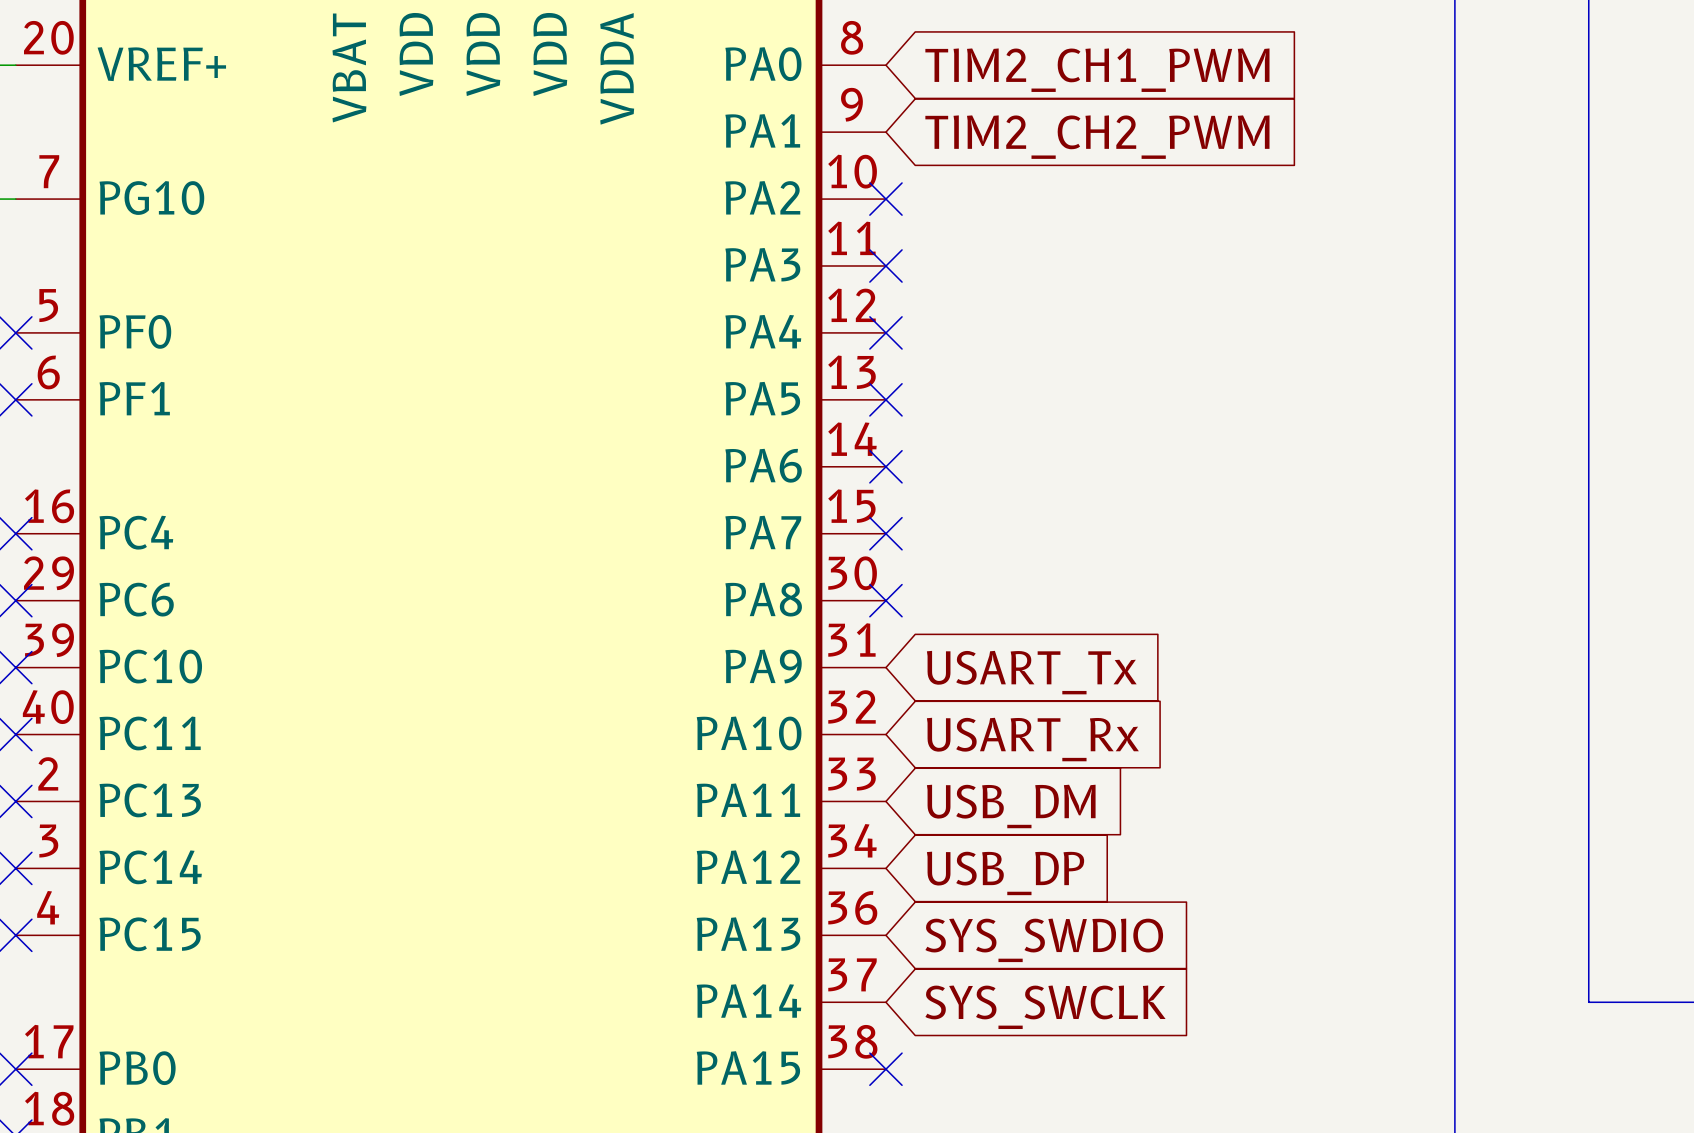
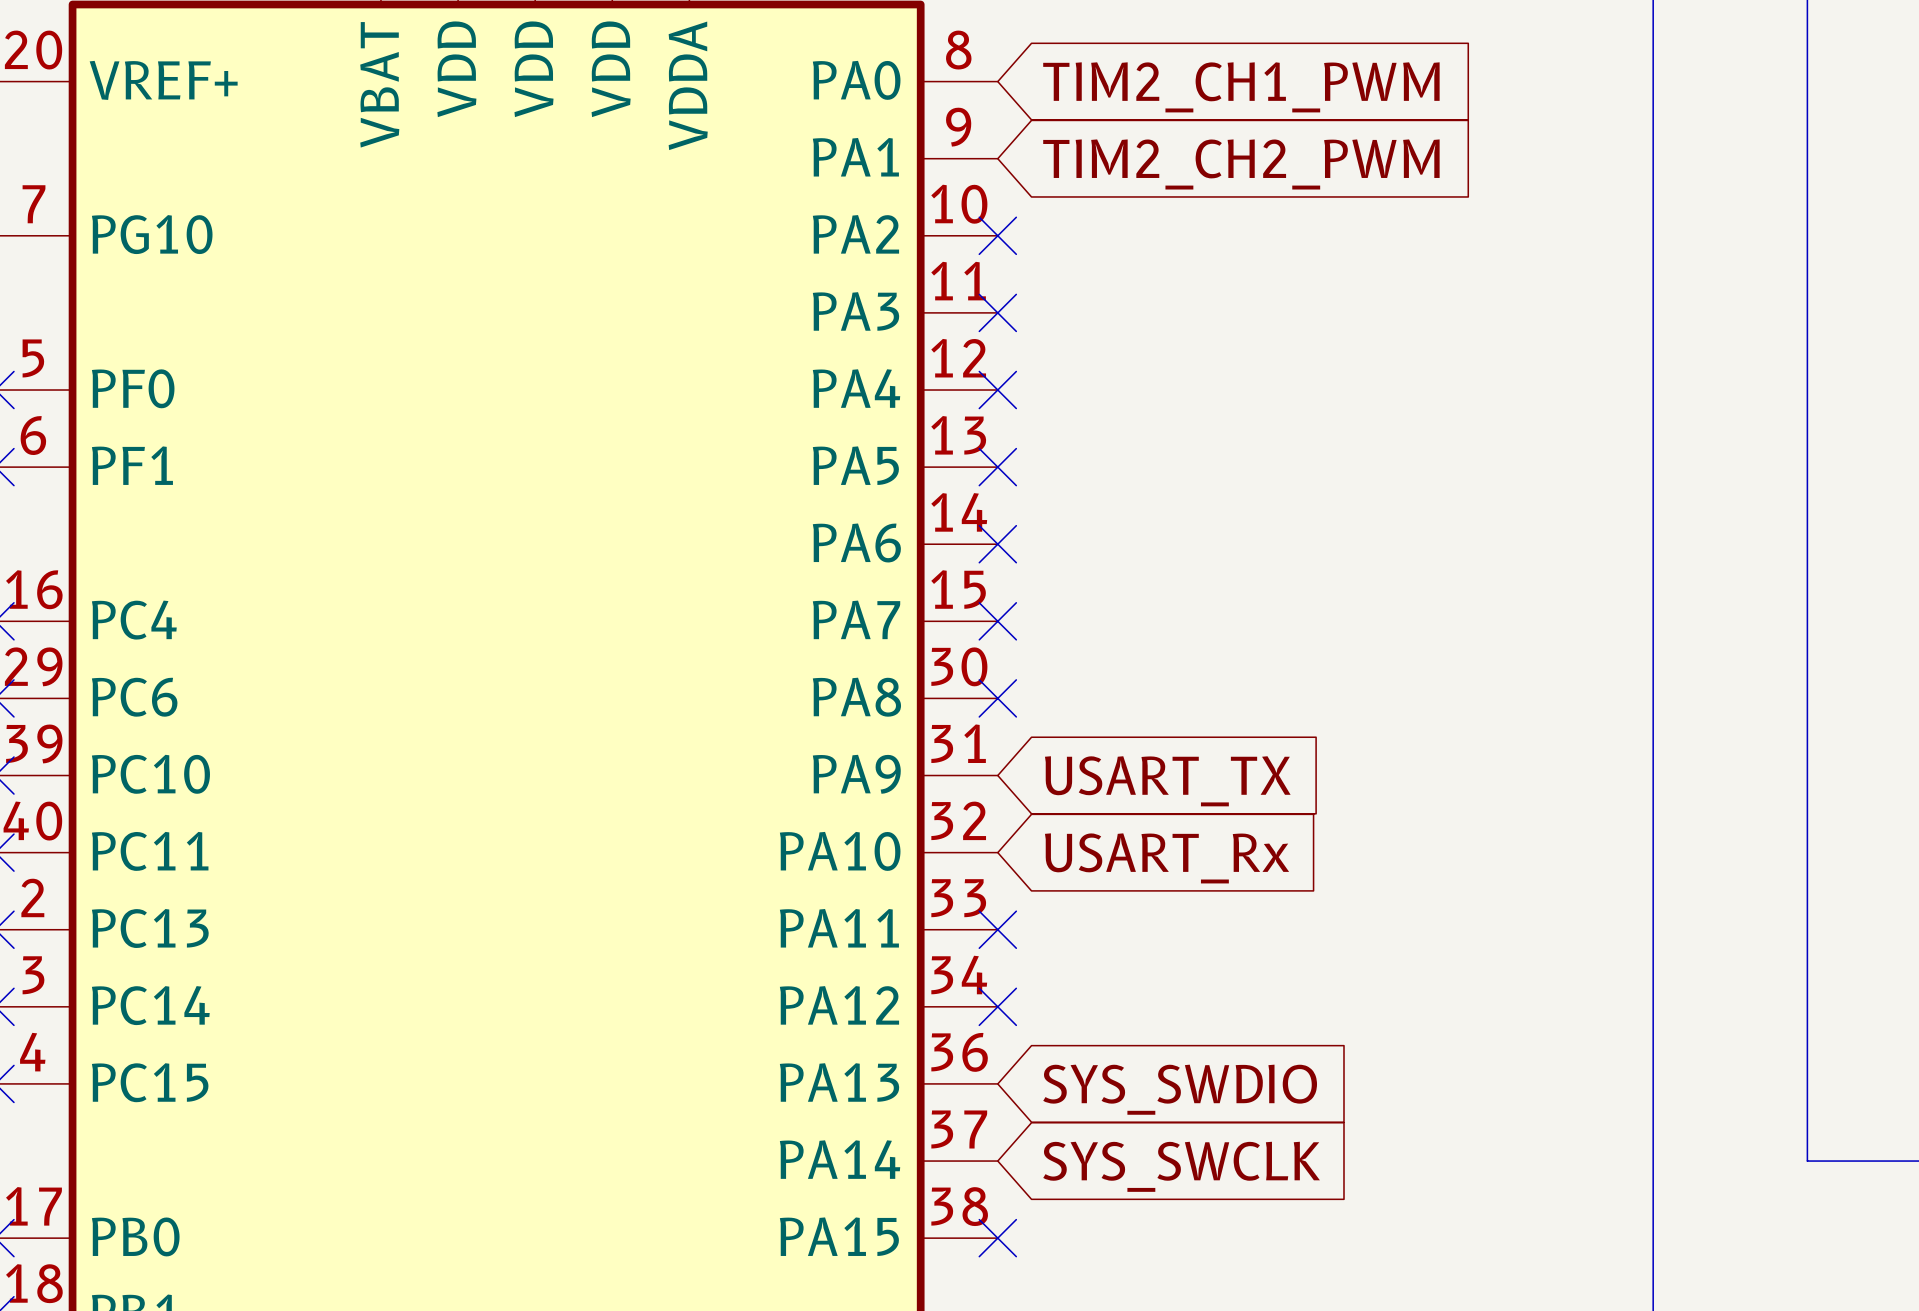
global label: USART_Tx (1031, 672) -> USART_TX (1167, 781)
no-connect mark: none -> (997, 929)
global label: USB_DM (1011, 806) -> none
no-connect mark: none -> (997, 1006)
global label: USB_DP (1005, 873) -> none

